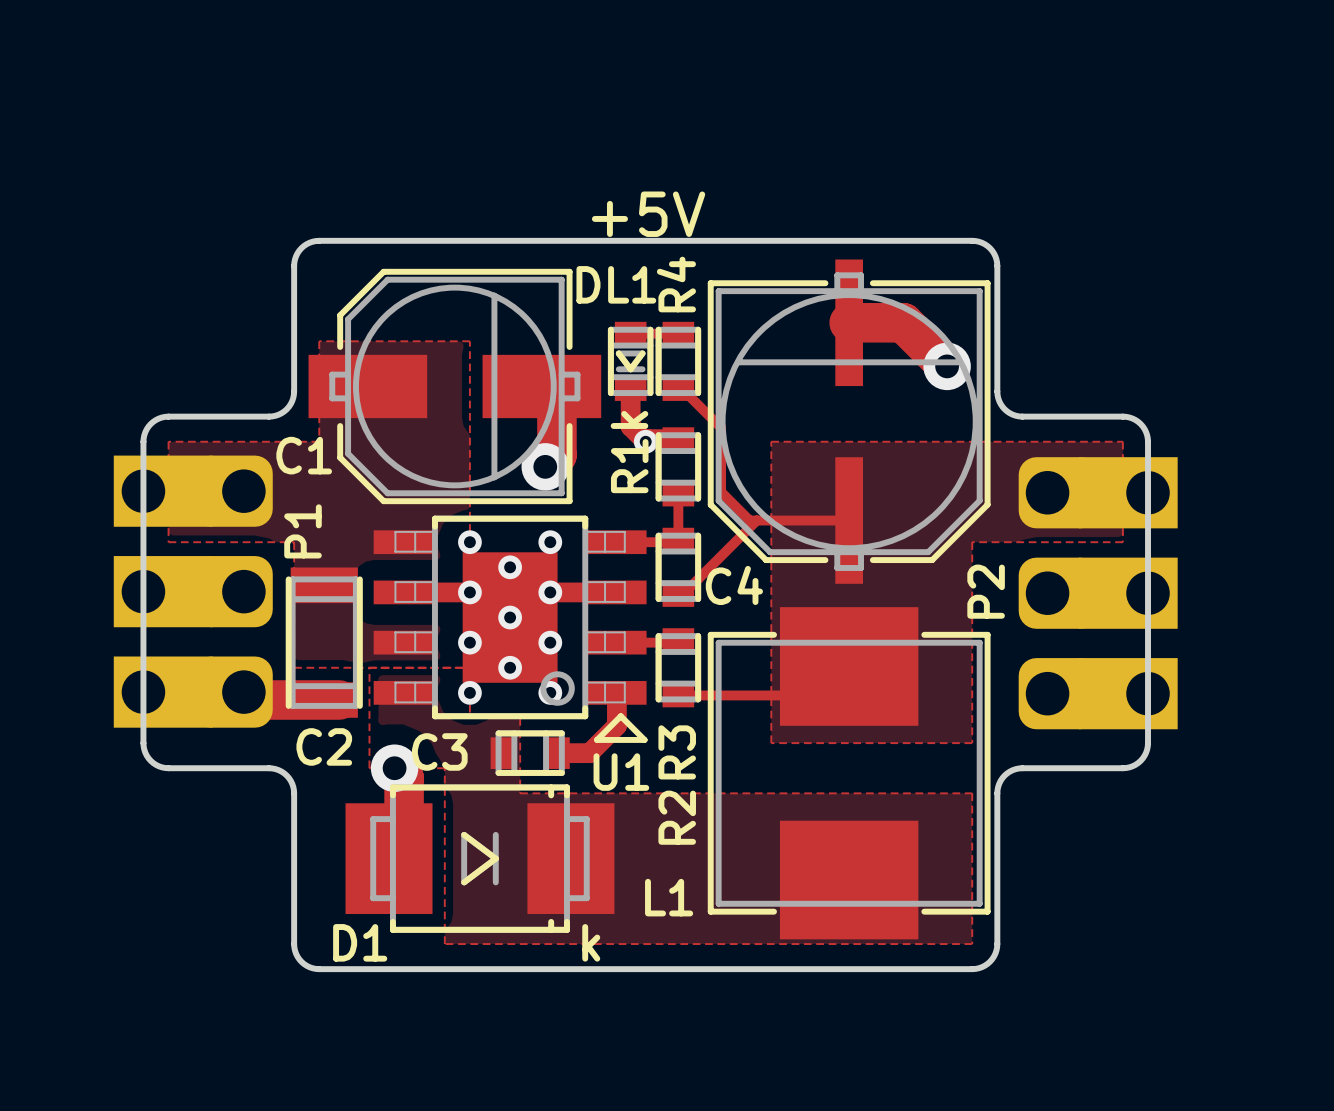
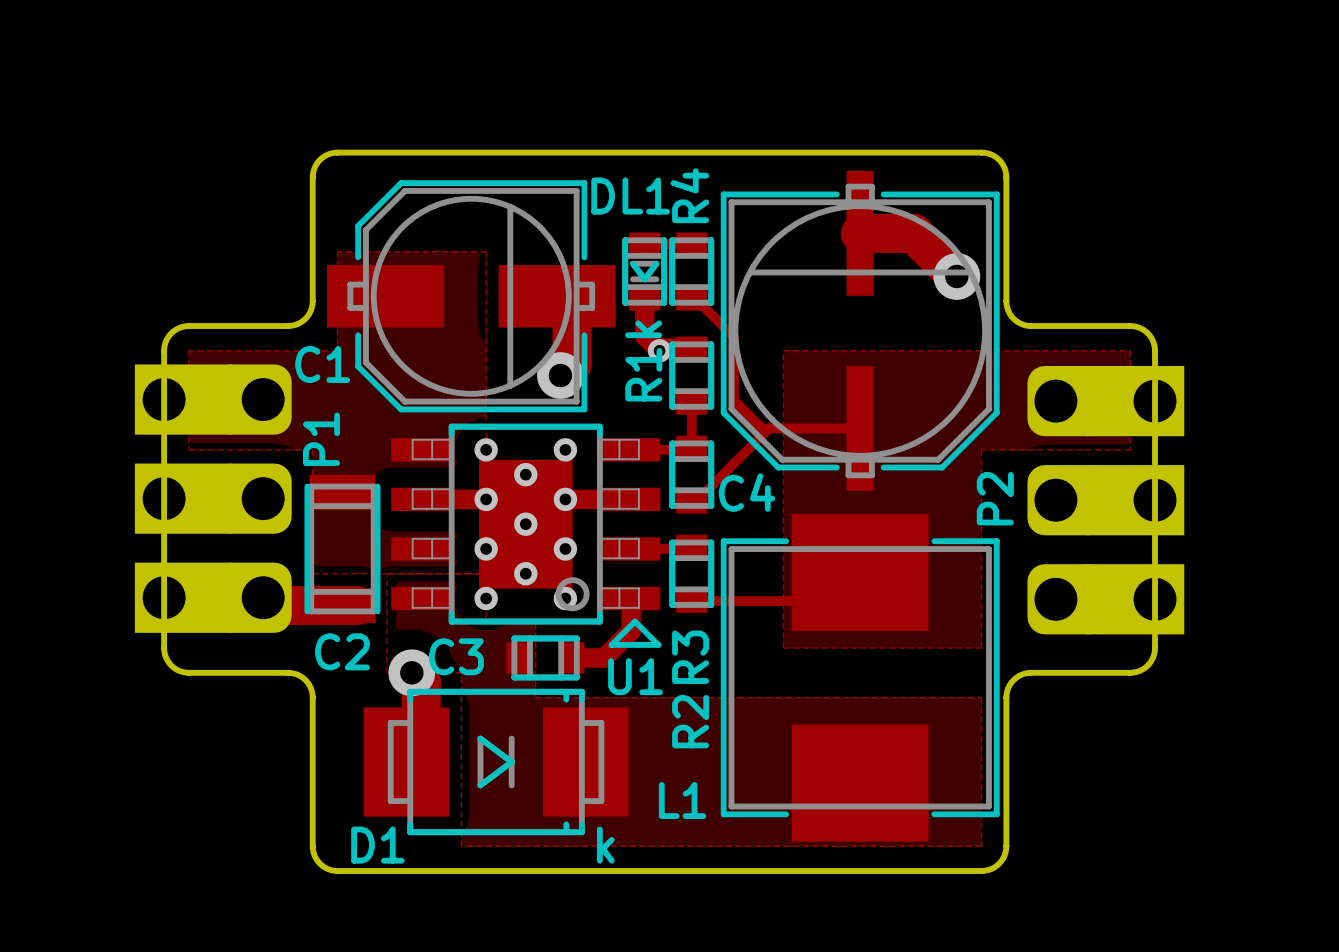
text: +5V (648, 214) -> none

